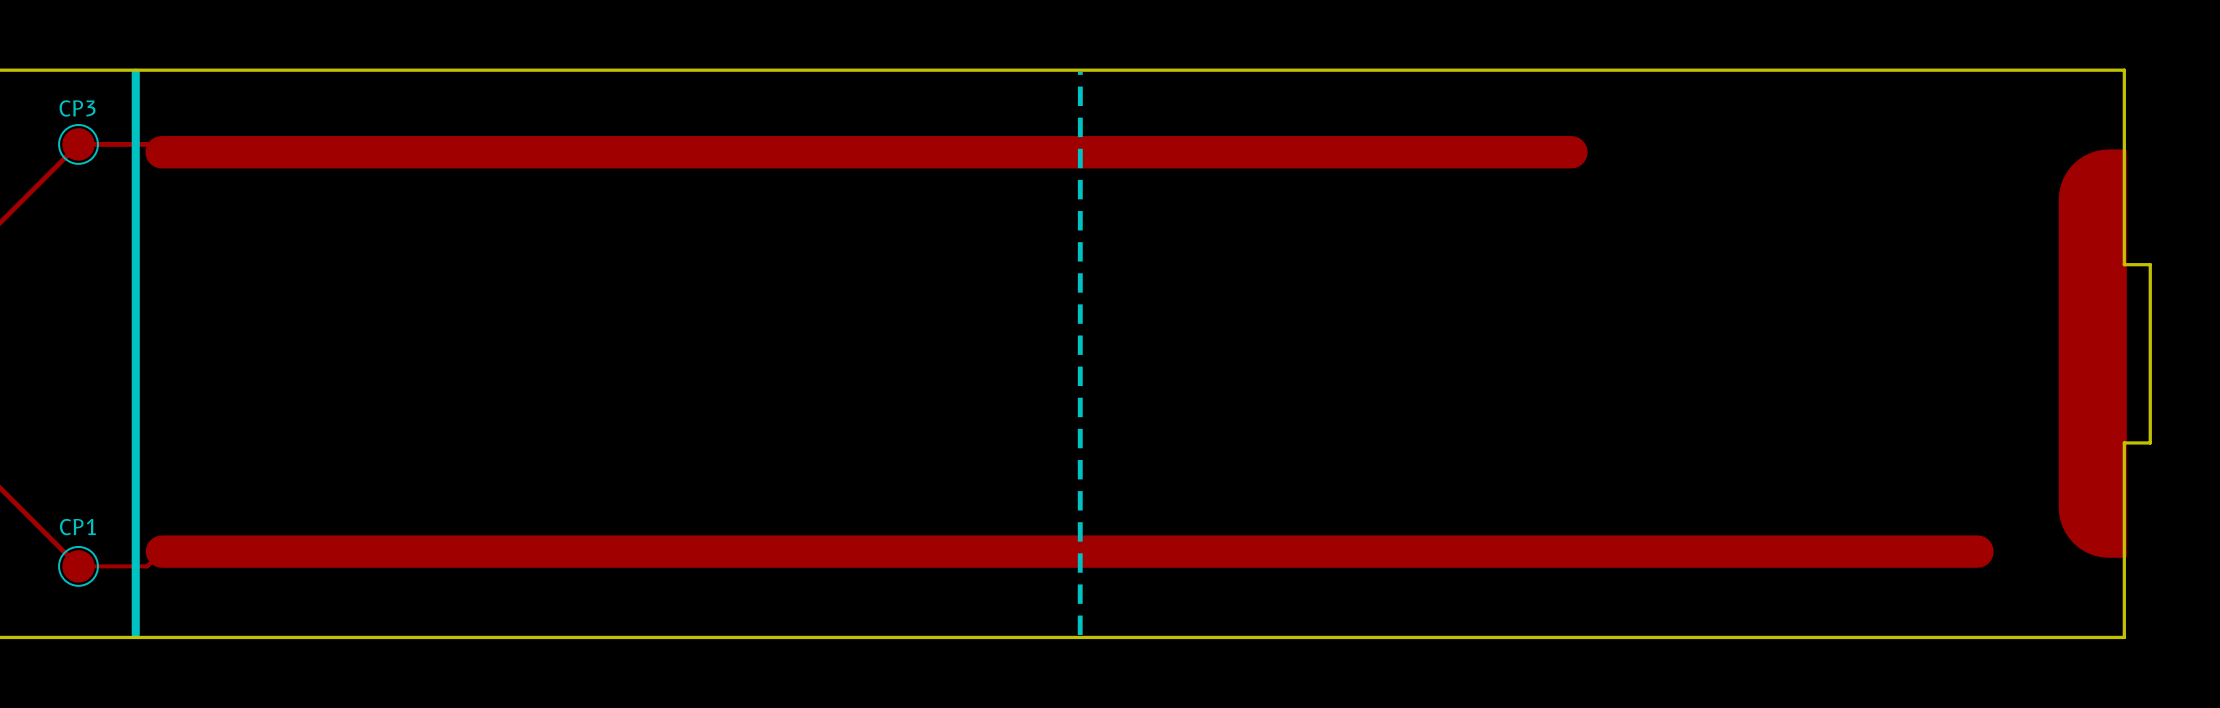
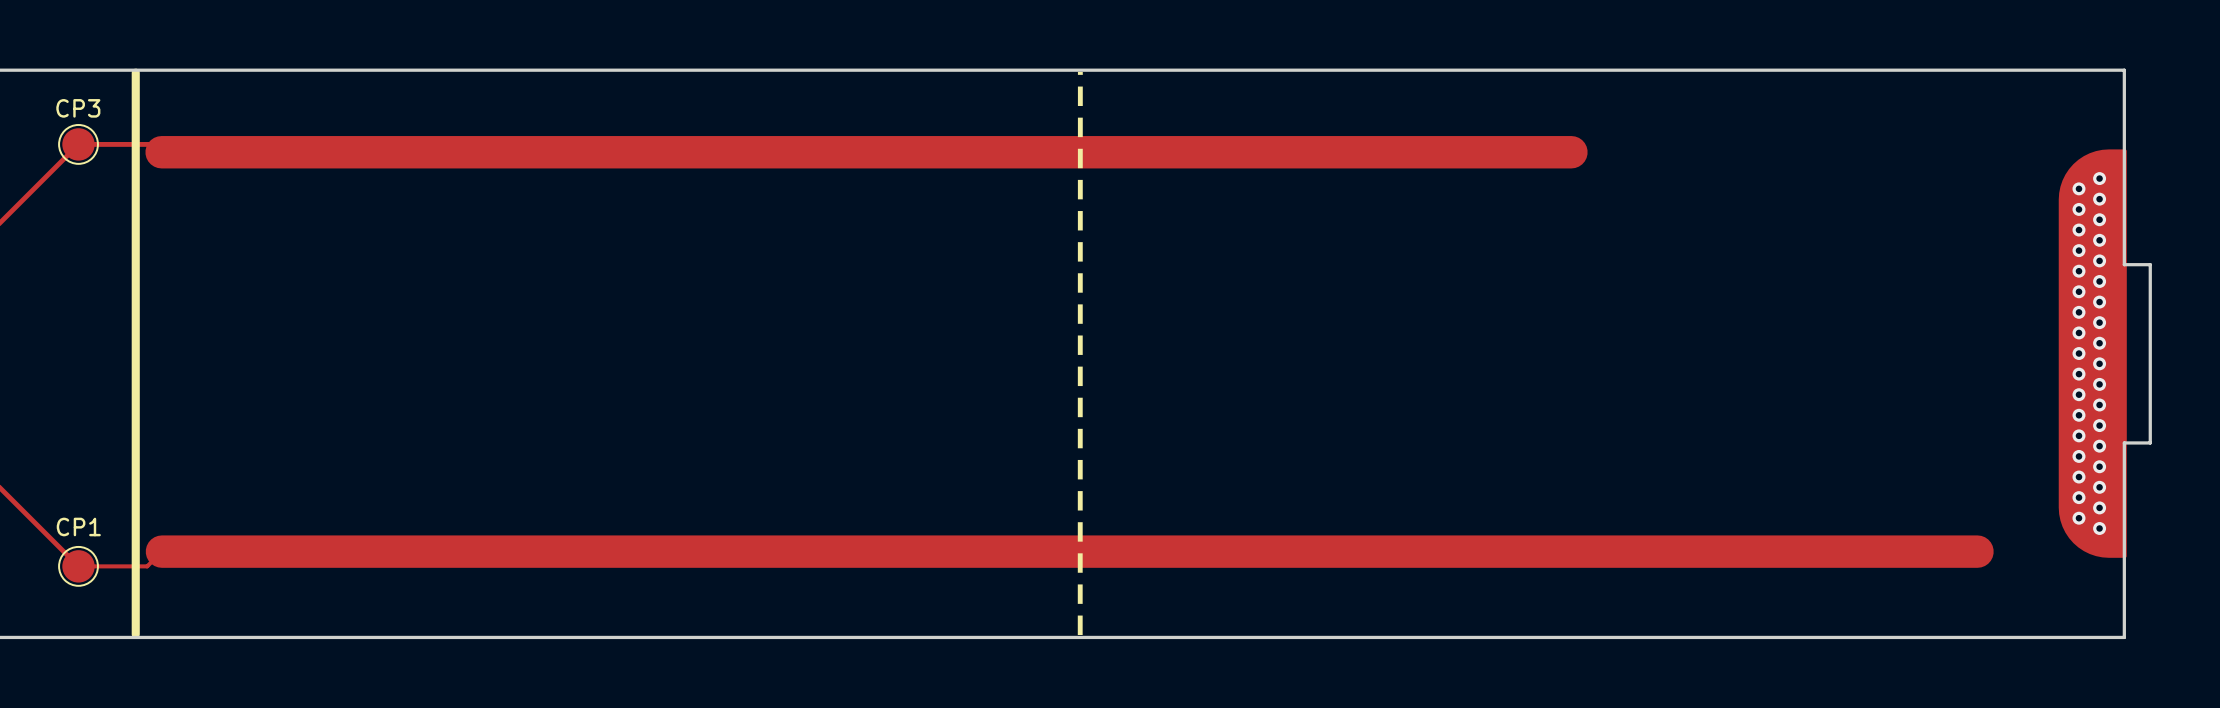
via: none -> (2099, 178)
via: none -> (2078, 188)
via: none -> (2099, 199)
via: none -> (2078, 209)
via: none -> (2099, 219)
via: none -> (2078, 230)
via: none -> (2099, 240)
via: none -> (2078, 250)
via: none -> (2099, 260)
via: none -> (2078, 271)
via: none -> (2099, 281)
via: none -> (2078, 291)
via: none -> (2099, 302)
via: none -> (2078, 312)
via: none -> (2099, 322)
via: none -> (2078, 332)
via: none -> (2099, 343)
via: none -> (2078, 353)
via: none -> (2099, 363)
via: none -> (2078, 374)
via: none -> (2099, 384)
via: none -> (2078, 394)
via: none -> (2099, 404)
via: none -> (2078, 415)
via: none -> (2099, 425)
via: none -> (2078, 435)
via: none -> (2099, 446)
via: none -> (2078, 456)
via: none -> (2099, 466)
via: none -> (2078, 477)
via: none -> (2099, 487)
via: none -> (2078, 497)
via: none -> (2099, 507)
via: none -> (2078, 518)
via: none -> (2099, 528)

